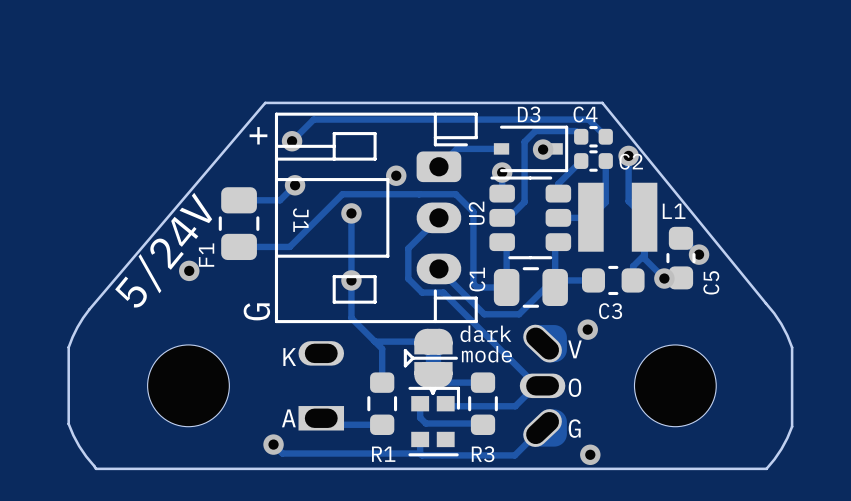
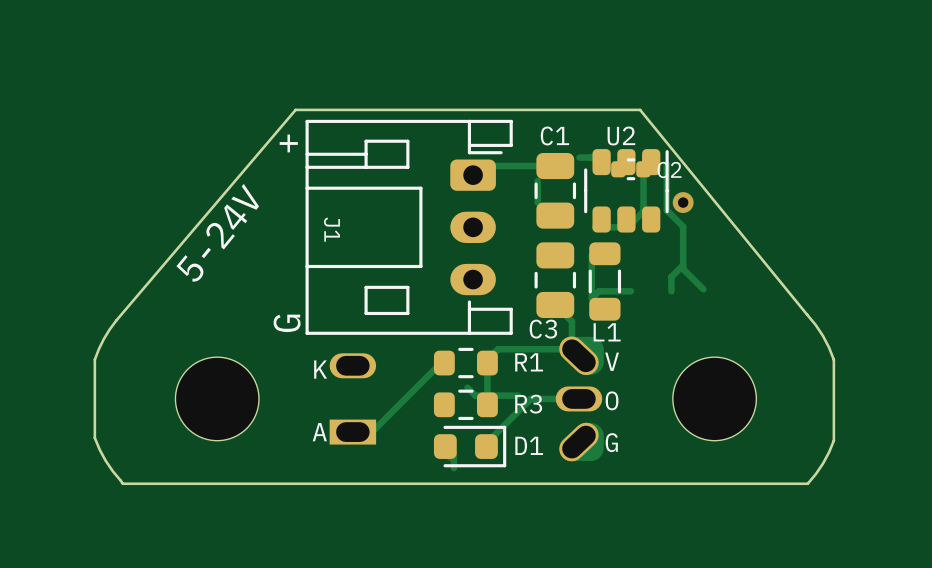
track: (581, 136) (575, 131) (535, 131) (524, 141) (524, 201) (508, 217) (502, 217) -> none
C4: (593, 136) -> none
track: (605, 136) (588, 119) (313, 119) (292, 141) -> none
via: (292, 141) -> none
track: (501, 148) (456, 148) (438, 166) -> none
D3: (531, 148) -> none
via: (543, 149) -> none
via: (628, 155) -> none
track: none -> (555, 166) (489, 166) (478, 176)
track: (581, 161) (558, 183) (558, 193) -> none
via: (502, 172) -> none
via: (396, 175) -> none
L1 footprint: [578, 182, 658, 252] -> [588, 242, 622, 321]
track: (295, 185) (280, 200) (239, 200) -> none
via: (295, 185) -> none
via: none -> (683, 202)
L1 name position: L1 (674, 211) -> L1 (607, 332)
track: (351, 213) (351, 318) (382, 348) (382, 382) -> none
via: (351, 213) -> none
track: (438, 217) (408, 248) (408, 278) (422, 292) (443, 292) (535, 384) (515, 406) (445, 406) -> none
U2 rotation: 0° (530, 217) -> 90° clockwise (626, 190)
U2 position: (530, 217) -> (626, 190)
F1: (239, 223) -> none
track: (502, 242) (506, 246) (506, 287) (477, 287) (473, 283) (473, 211) (455, 194) (342, 194) (289, 246) (239, 246) -> none
text: 5/24V (163, 250) -> 5-24V (217, 232)
via: (699, 254) -> none
C5: (680, 258) -> none
C3 footprint: [581, 265, 645, 296] -> [534, 242, 577, 319]
track: (438, 268) (484, 314) (519, 314) (545, 287) (555, 287) -> none
via: (189, 270) -> none
via: (664, 278) -> none
via: (351, 280) -> none
C1 rotation: 0° (530, 287) -> 90° clockwise (555, 190)
C1 position: (530, 287) -> (555, 190)
track: none -> (555, 304) (571, 321) (571, 349) (498, 349) (487, 359) (487, 401)
via: (587, 329) -> none
track: (374, 341) (433, 341) -> none
part: (430, 358) -> none
track: none -> (571, 398) (530, 398) (486, 443)
R1 rotation: 0° (382, 403) -> 90° clockwise (465, 363)
R1 position: (382, 403) -> (465, 363)
track: (420, 403) (420, 417) (425, 423) (483, 424) -> none
R3 rotation: 0° (483, 403) -> 90° clockwise (465, 404)
R3 position: (483, 403) -> (465, 404)
track: (328, 418) (334, 424) (382, 424) -> (359, 432) (372, 432) (444, 359)
part: (434, 421) -> none
D1: none -> (470, 446)
track: (535, 434) (514, 455) (282, 453) (273, 444) -> none
via: (273, 444) -> none
R1 name position: R1 (383, 454) -> R1 (529, 362)
R3 name position: R3 (483, 454) -> R3 (528, 404)
via: (590, 454) -> none

